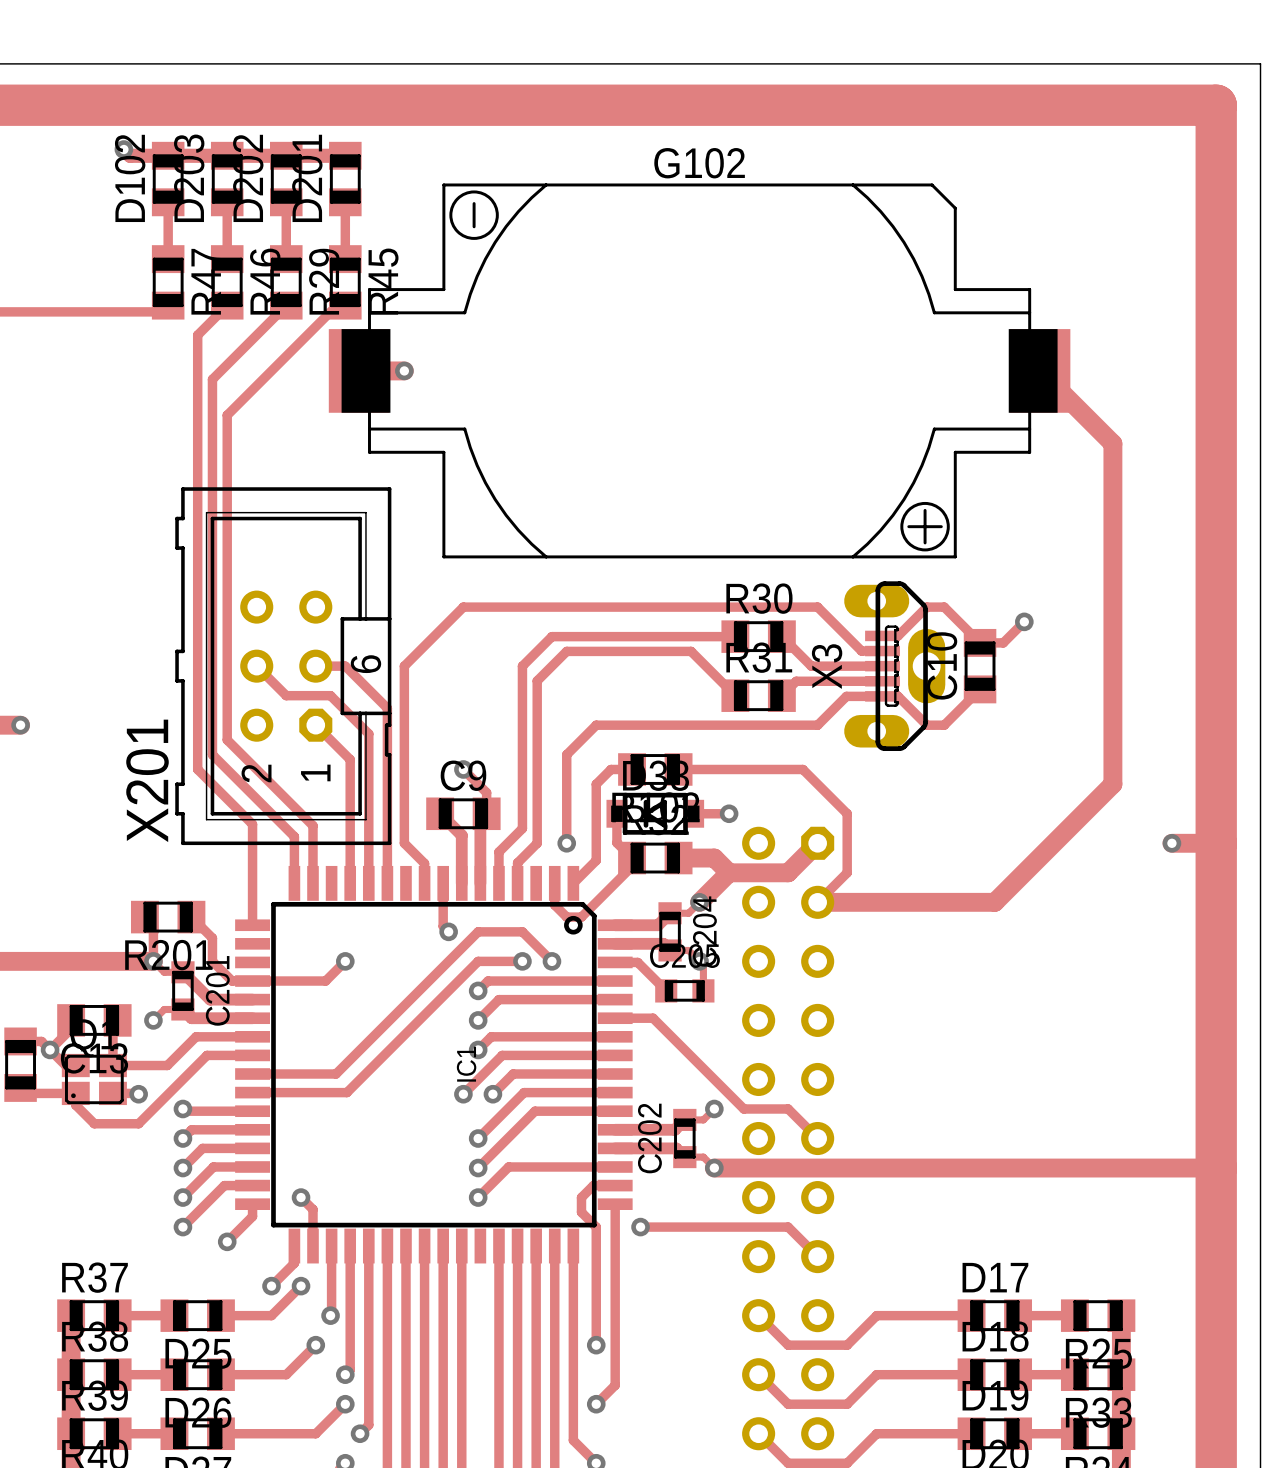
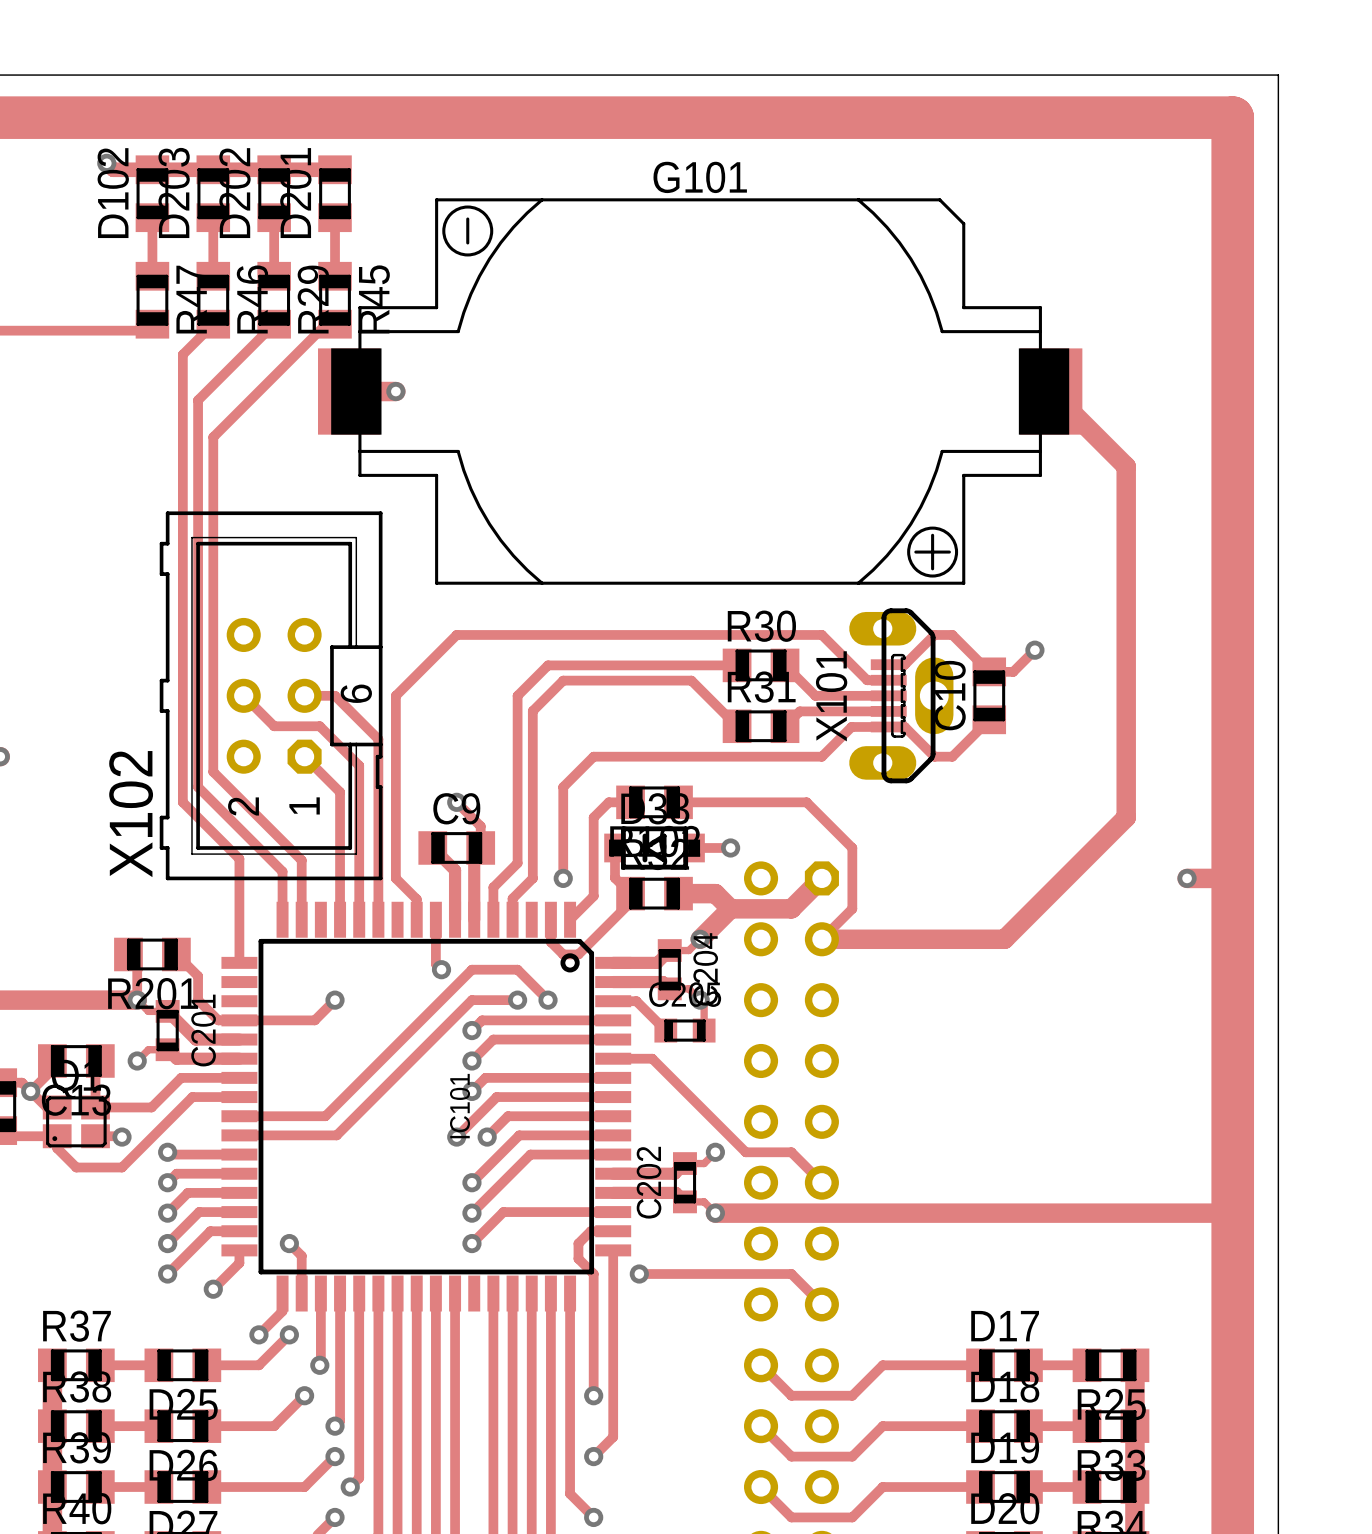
G102 name: G102 (699, 163) -> G101 (700, 177)
X3 name: X3 (827, 666) -> X101 (831, 696)
X201 name: X201 (147, 780) -> X102 (131, 814)
IC1 name: IC1 (466, 1064) -> IC101 (460, 1106)

